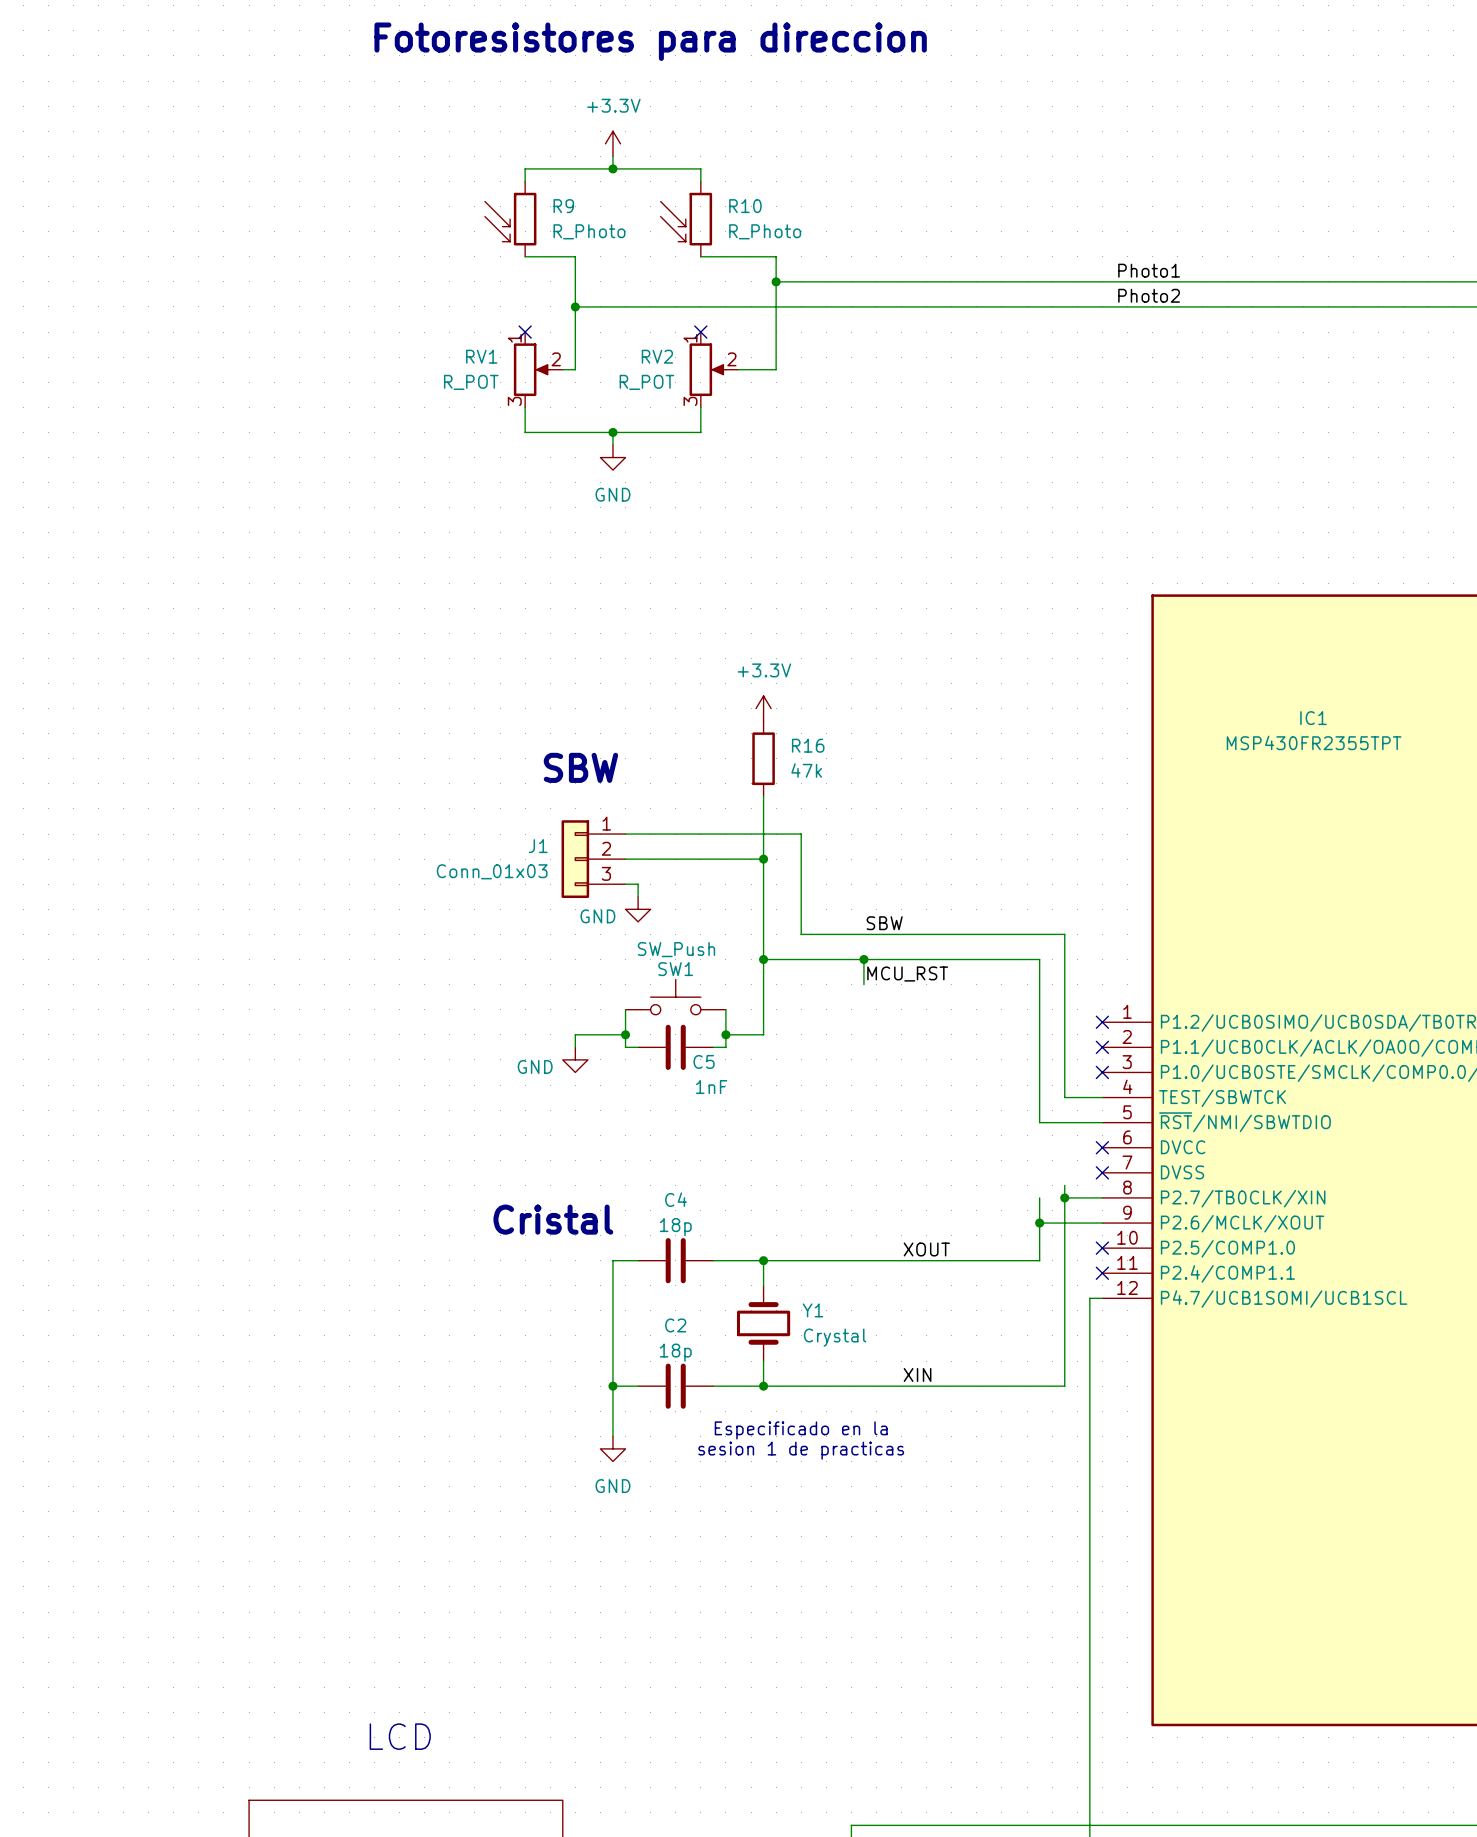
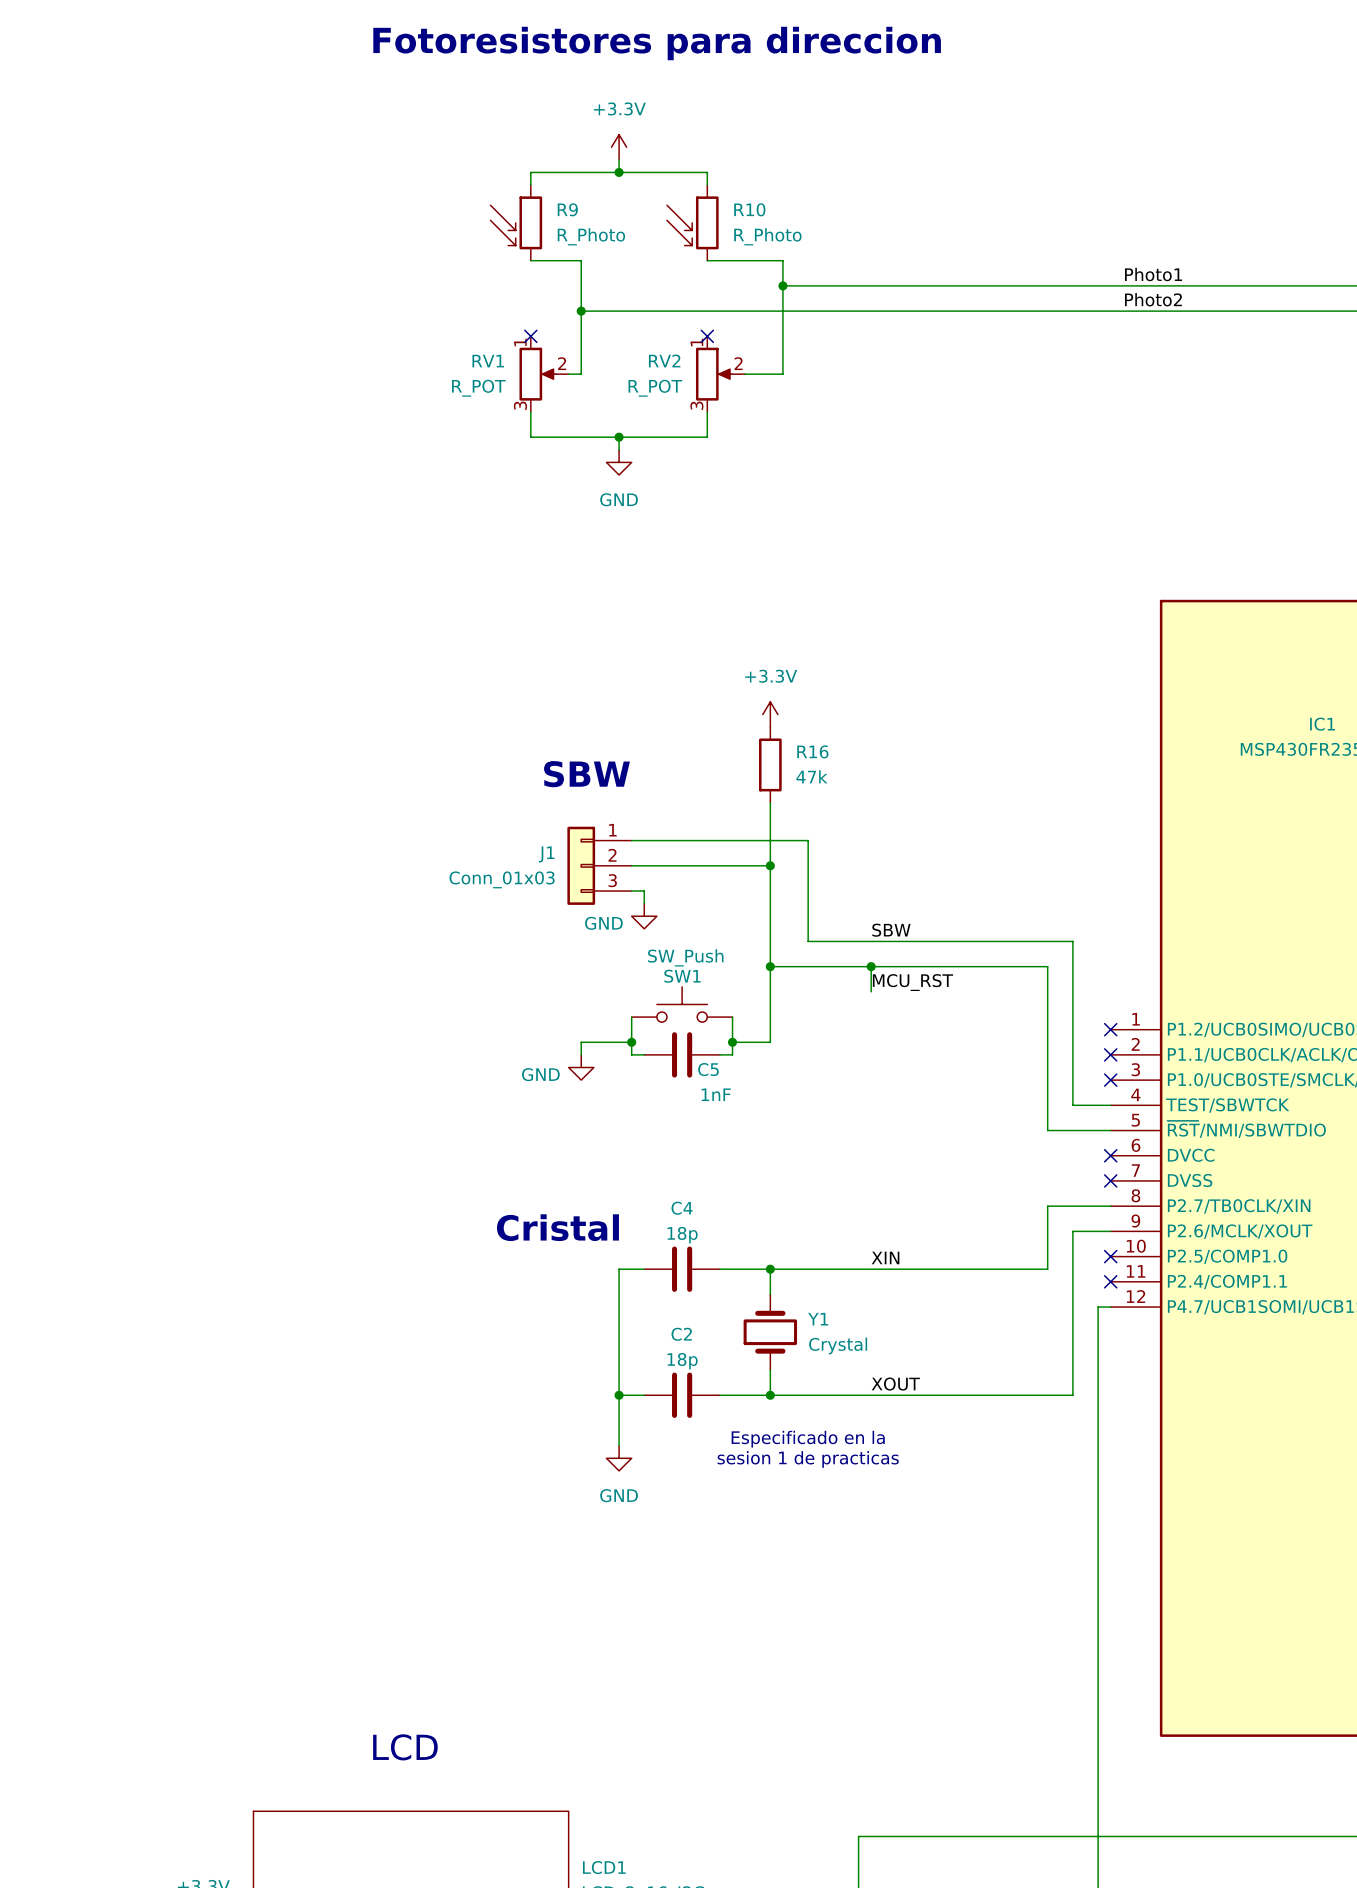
wire: (1064, 1185) (1064, 1223) (1039, 1223) -> none
wire: none -> (1047, 1206) (1072, 1206)
junction: (1064, 1197) -> none
junction: (1039, 1223) -> none
label position: XOUT (926, 1249) -> XOUT (895, 1384)
label position: XIN (917, 1374) -> XIN (885, 1257)

